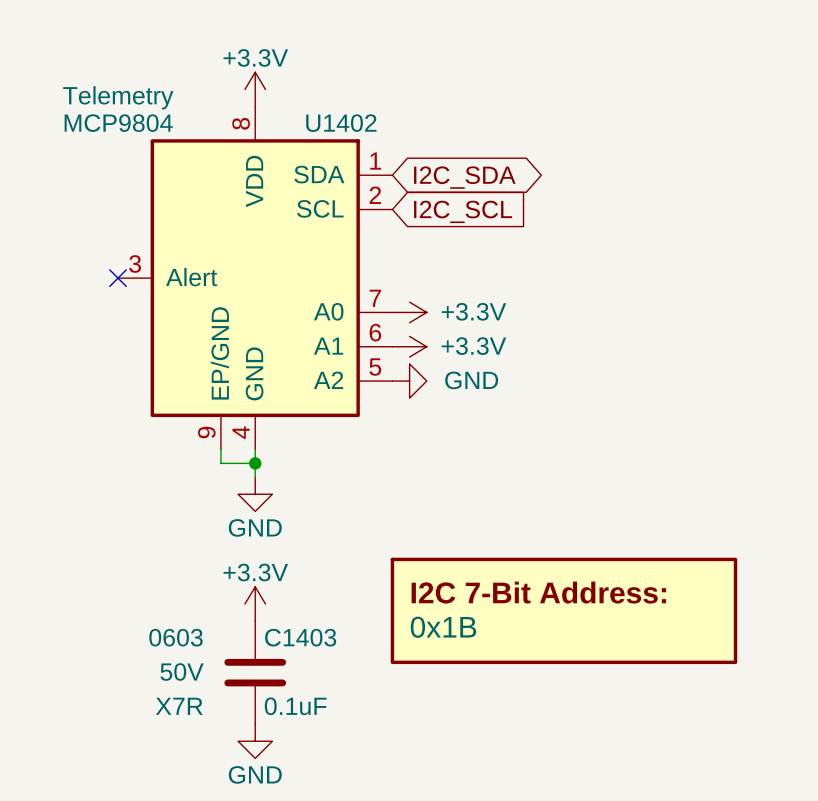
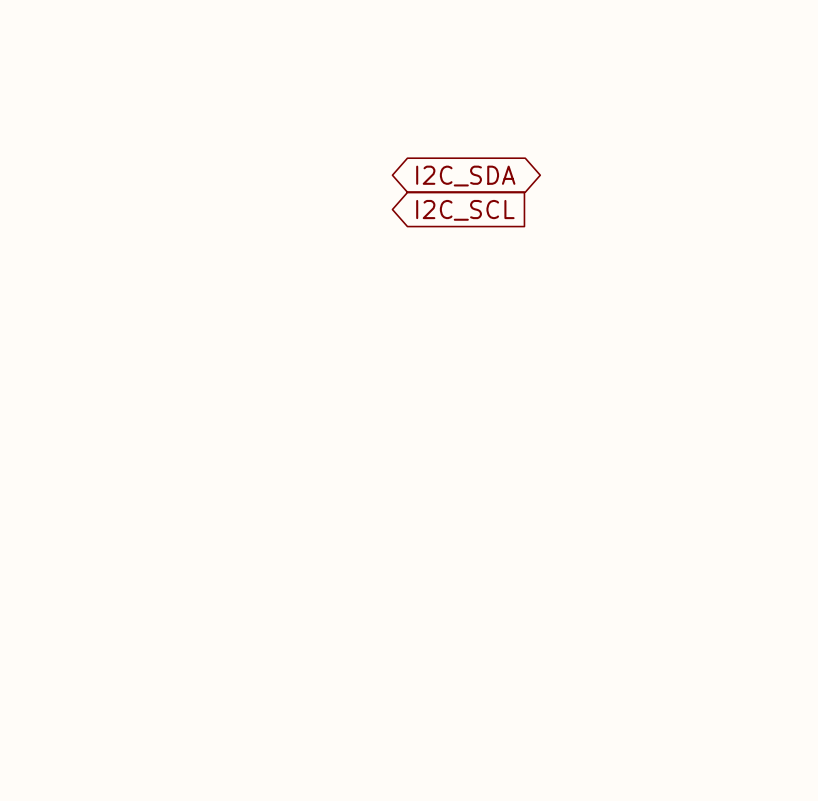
power symbol: +3.3V (255, 89) -> none
no-connect mark: (118, 278) -> none
U1402: MCP9804 (255, 278) -> none
power symbol: +3.3V (409, 312) -> none
power symbol: +3.3V (409, 346) -> none
power symbol: GND (409, 381) -> none
wire: (220, 449) (220, 463) (255, 463) -> none
wire: (255, 449) (255, 477) -> none
junction: (255, 463) -> none
power symbol: GND (255, 494) -> none
power symbol: +3.3V (255, 604) -> none
part: 0x1B (563, 610) -> none
C1403: 0.1uF (255, 672) -> none
power symbol: GND (255, 741) -> none

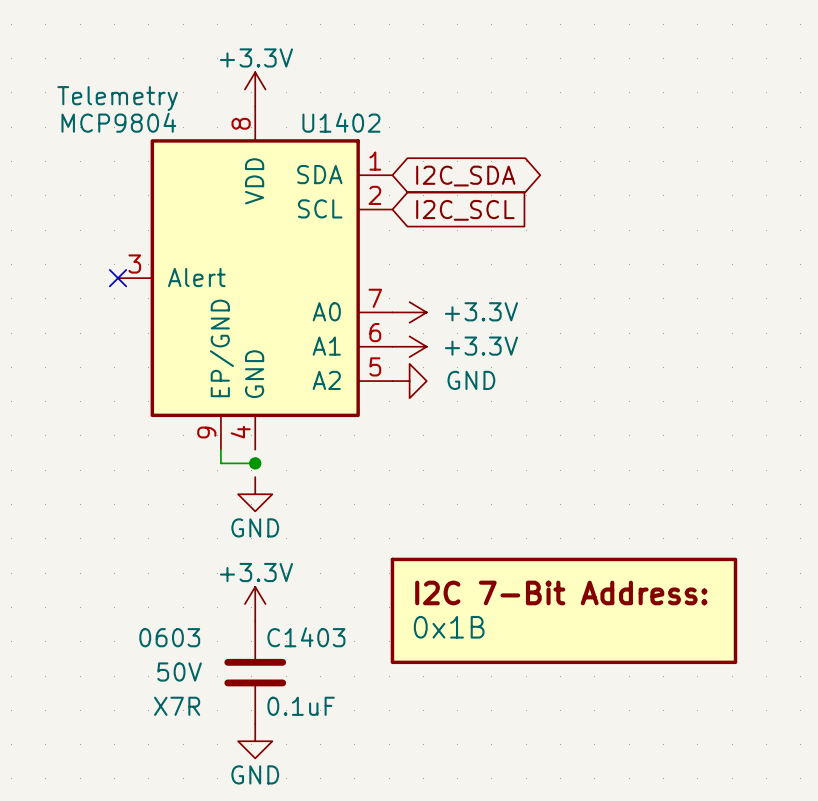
power symbol: none -> +3.3V (255, 89)
no-connect mark: none -> (118, 278)
U1402: none -> MCP9804 (255, 278)
power symbol: none -> +3.3V (409, 312)
power symbol: none -> +3.3V (409, 346)
power symbol: none -> GND (409, 381)
wire: none -> (220, 449) (220, 463) (255, 463)
junction: none -> (255, 463)
power symbol: none -> GND (255, 494)
power symbol: none -> +3.3V (255, 604)
part: none -> 0x1B (563, 610)
C1403: none -> 0.1uF (255, 672)
power symbol: none -> GND (255, 741)

